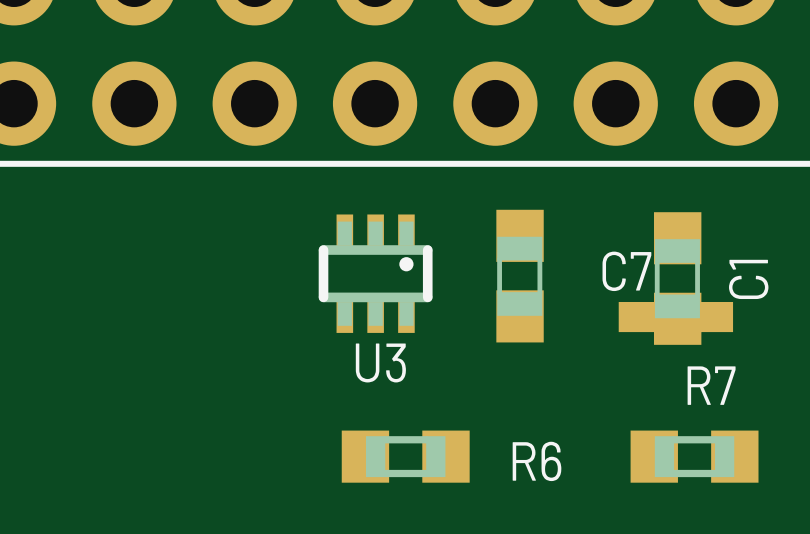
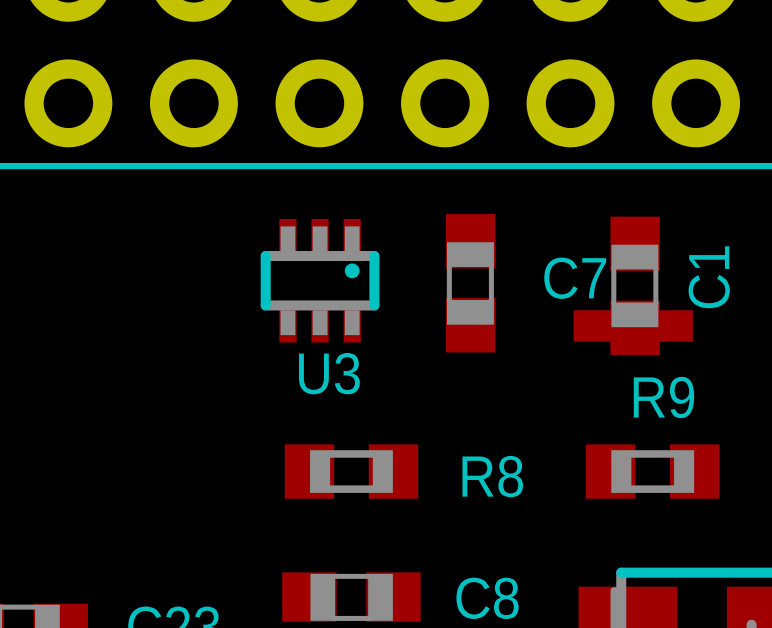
R7 name: R7 (711, 385) -> R9 (663, 397)
R6 name: R6 (537, 461) -> R8 (492, 476)

